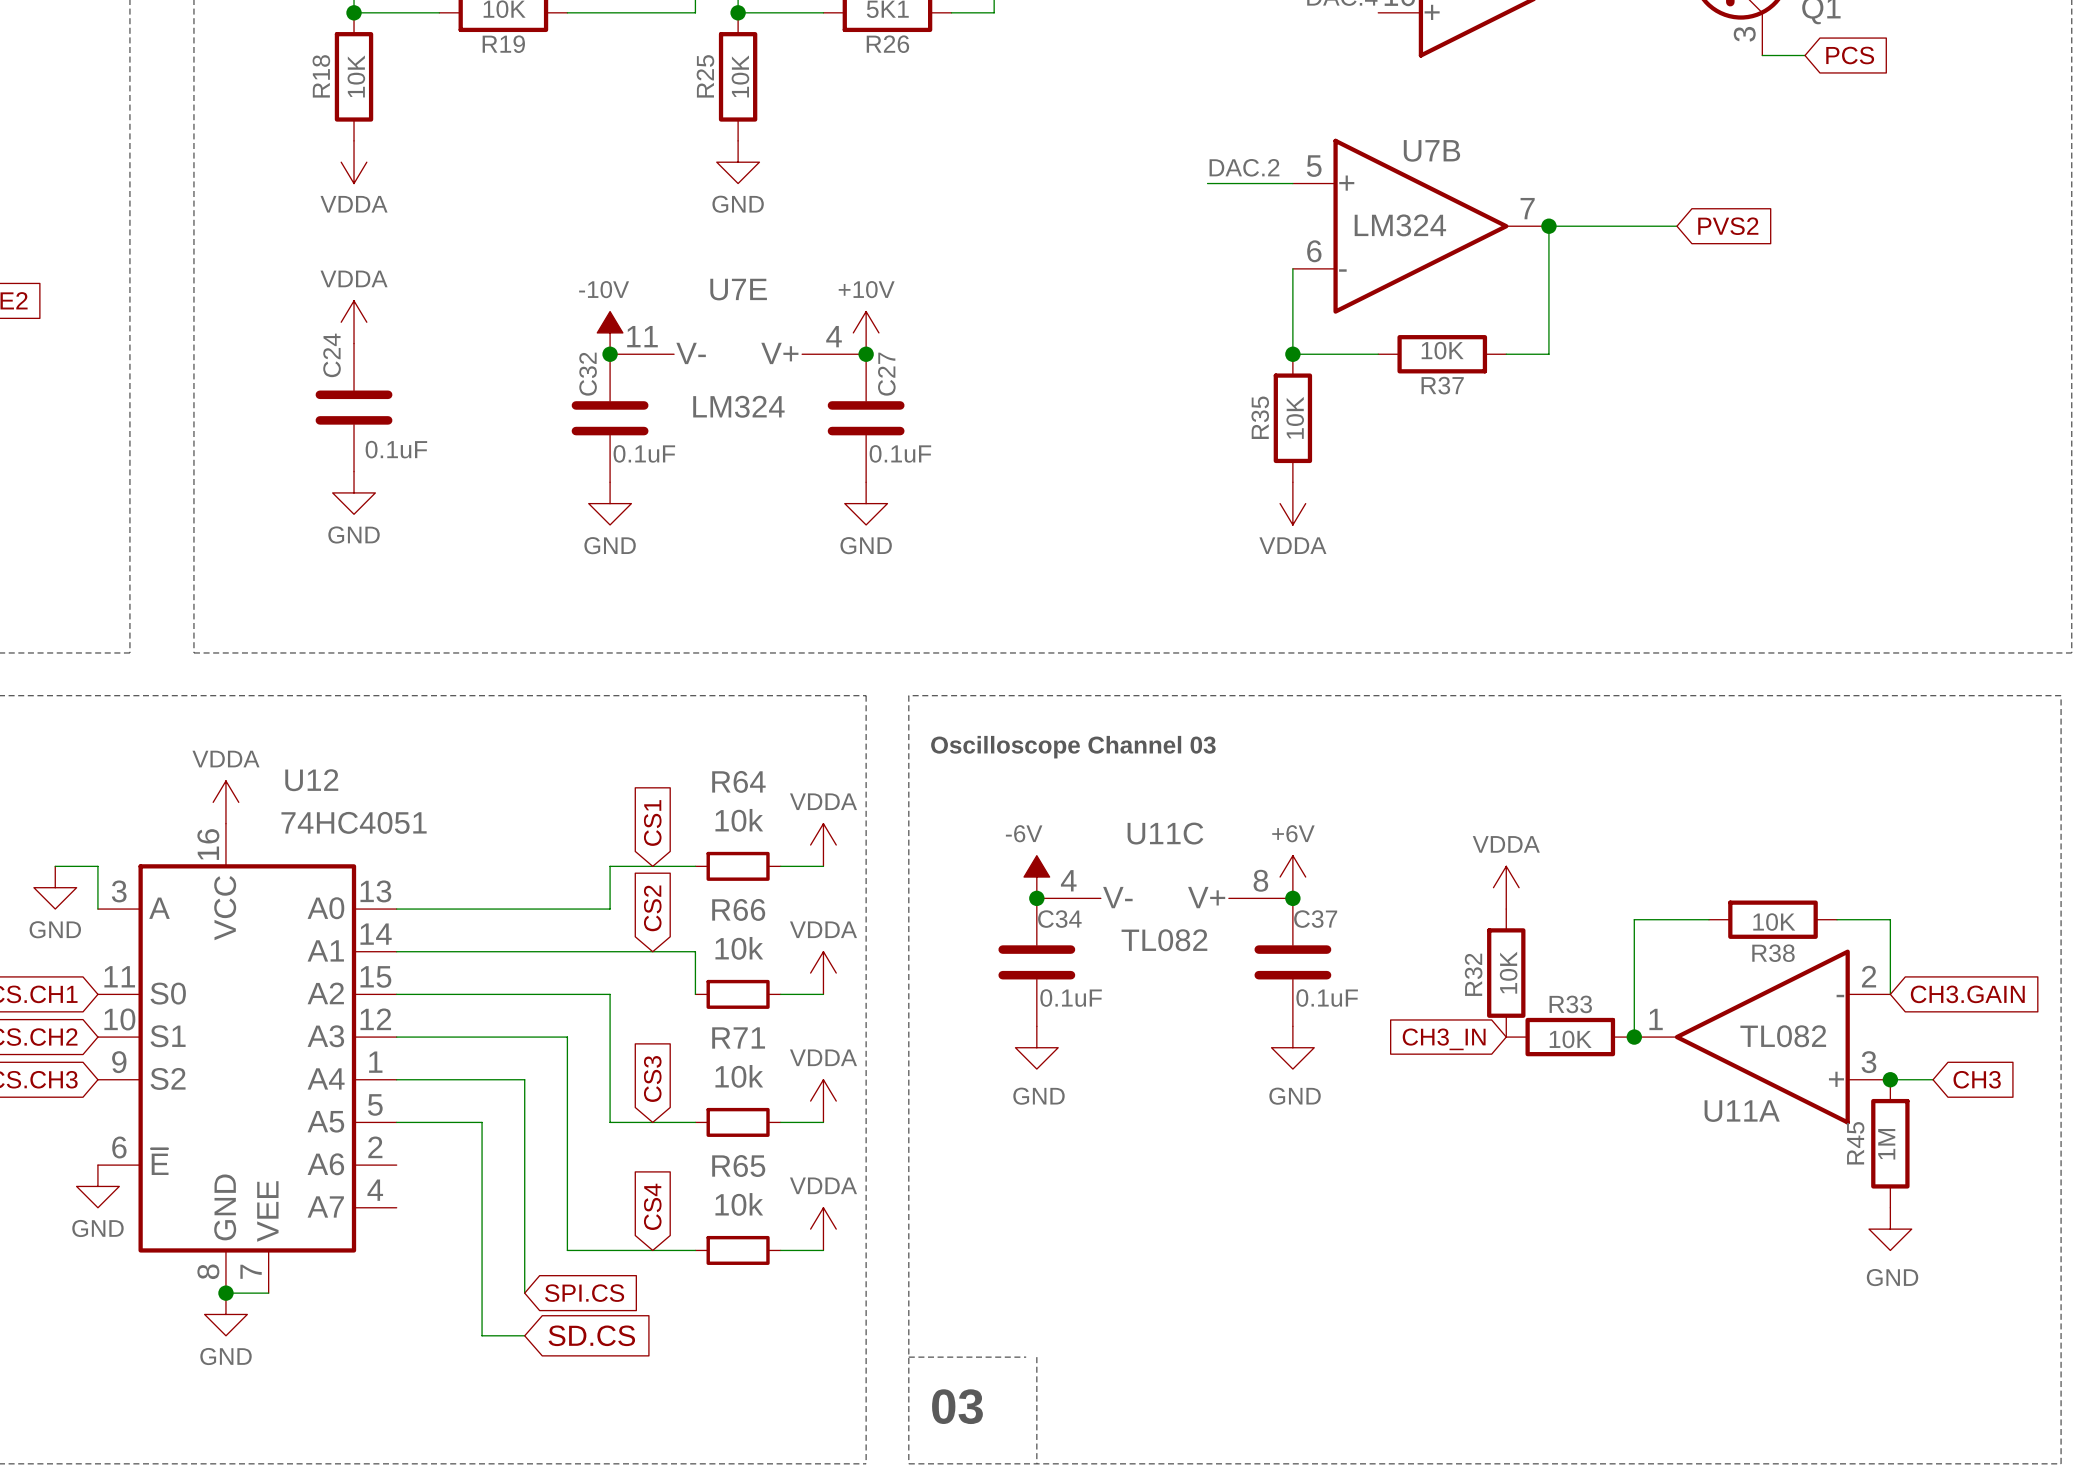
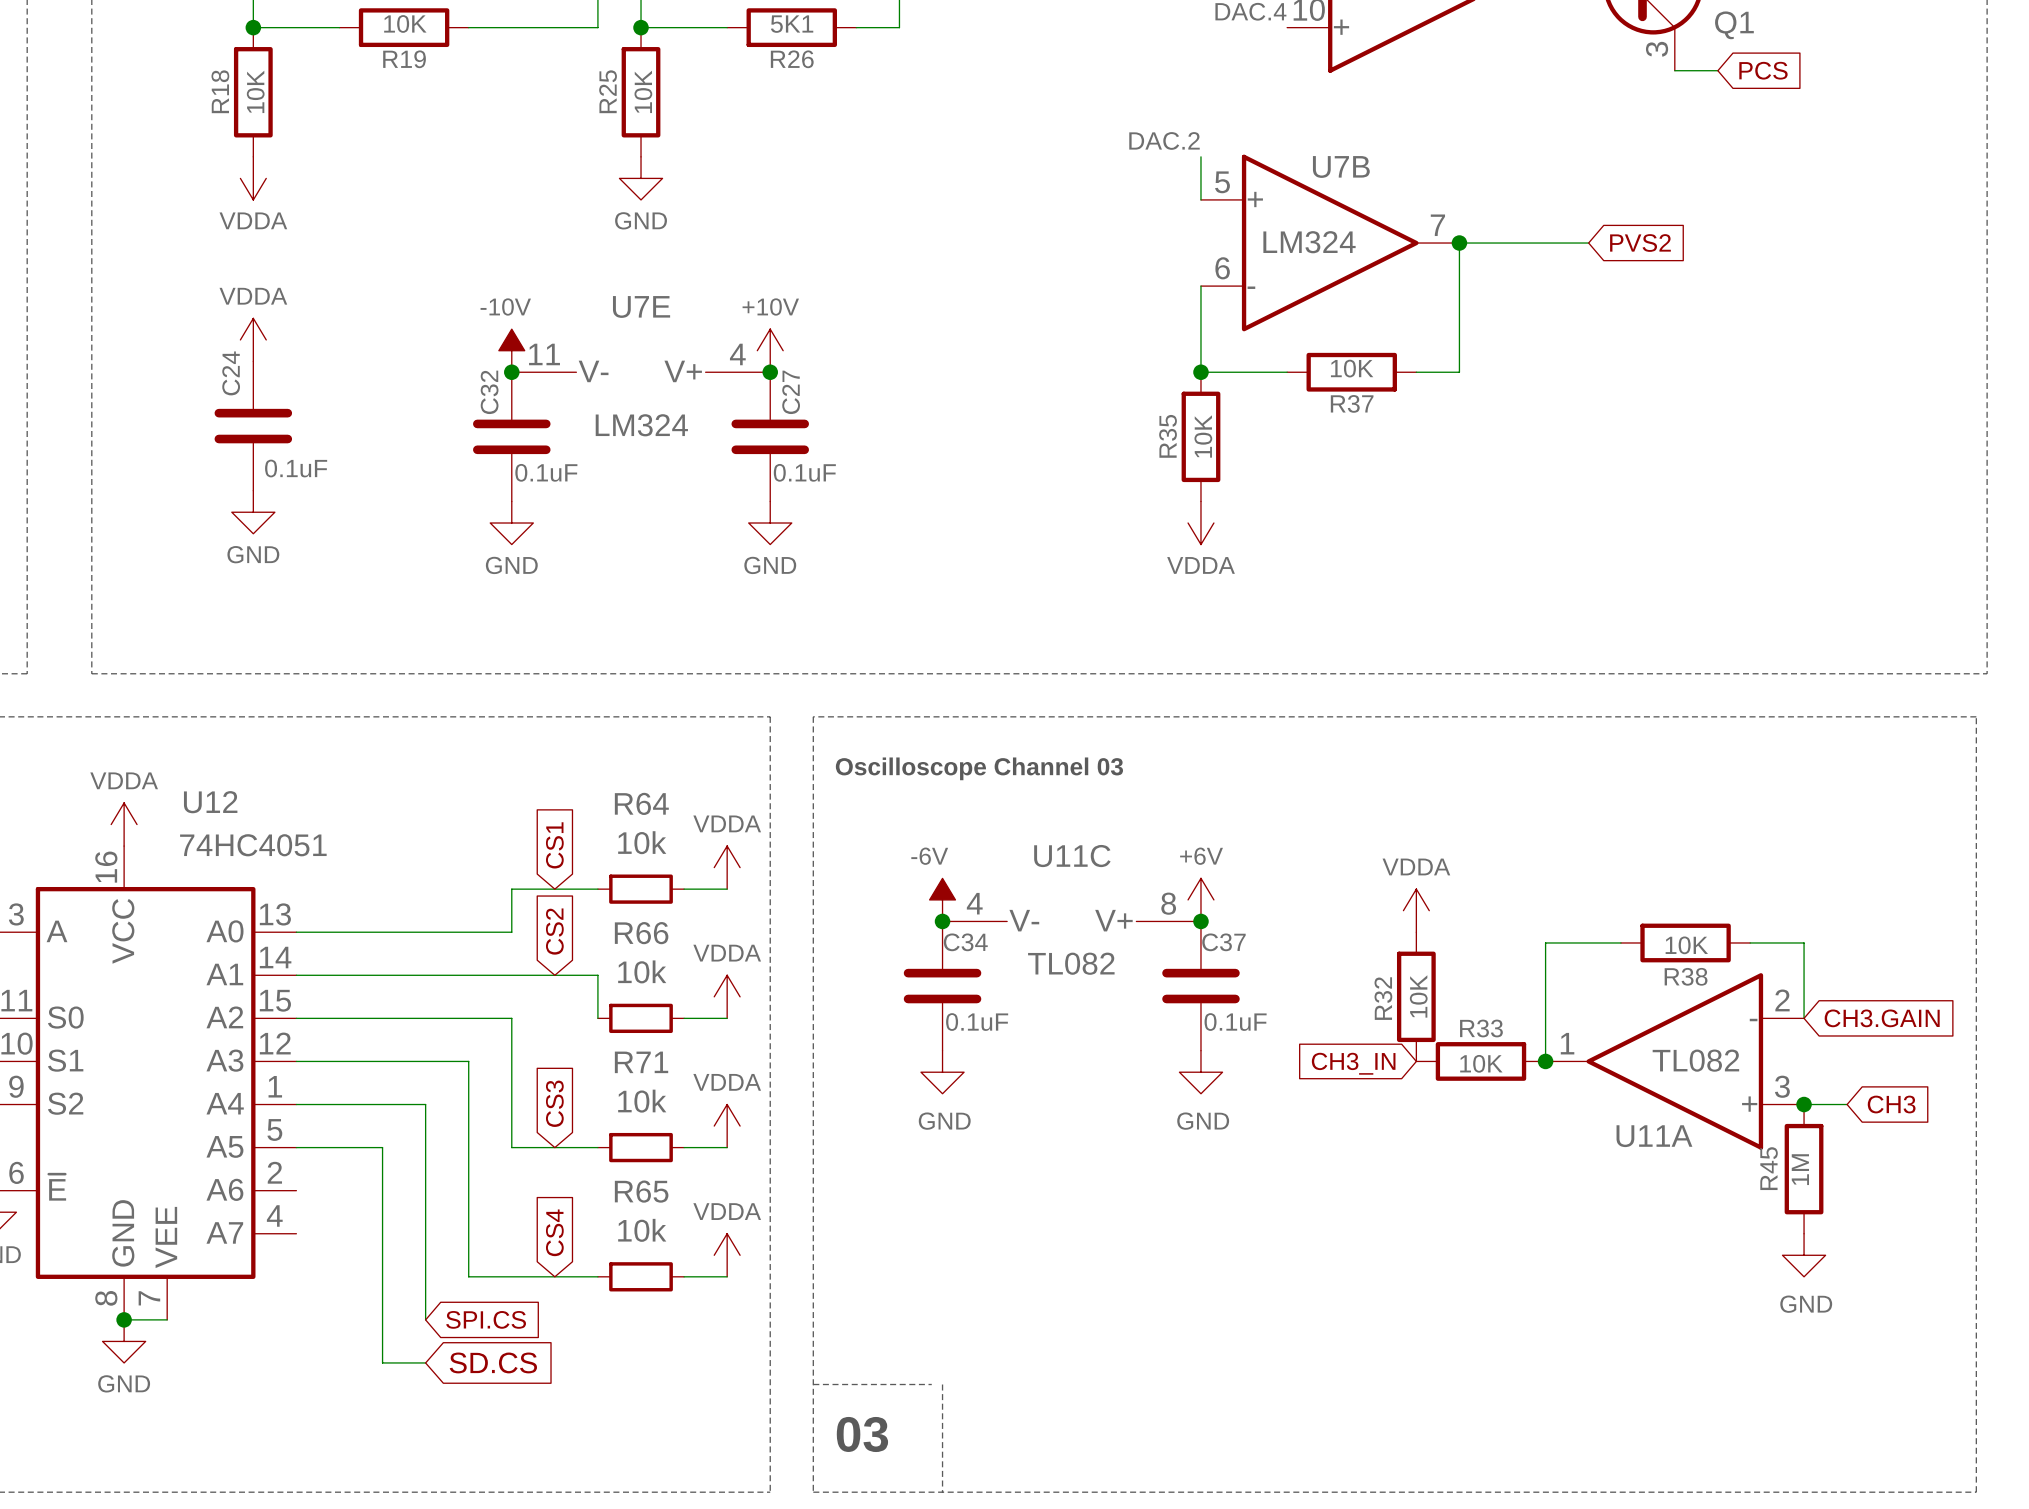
label position: DAC.2 (1244, 167) -> DAC.2 (1164, 140)
wire: (1207, 183) (1292, 183) -> (1200, 156) (1200, 199)

